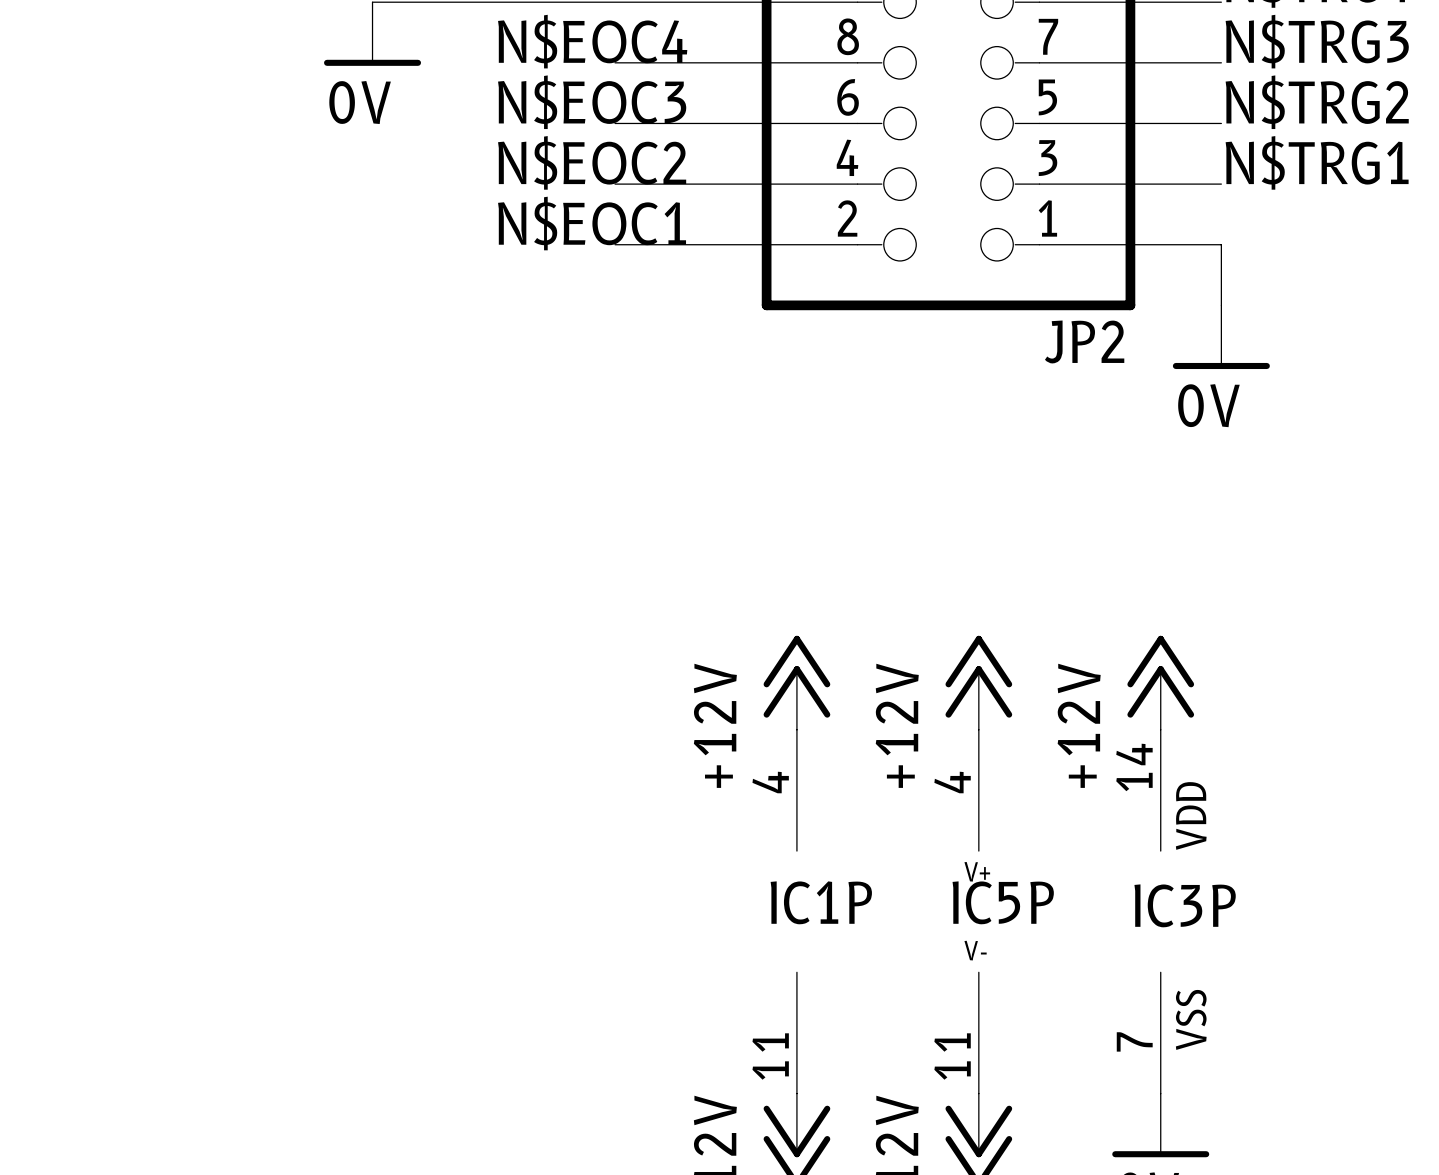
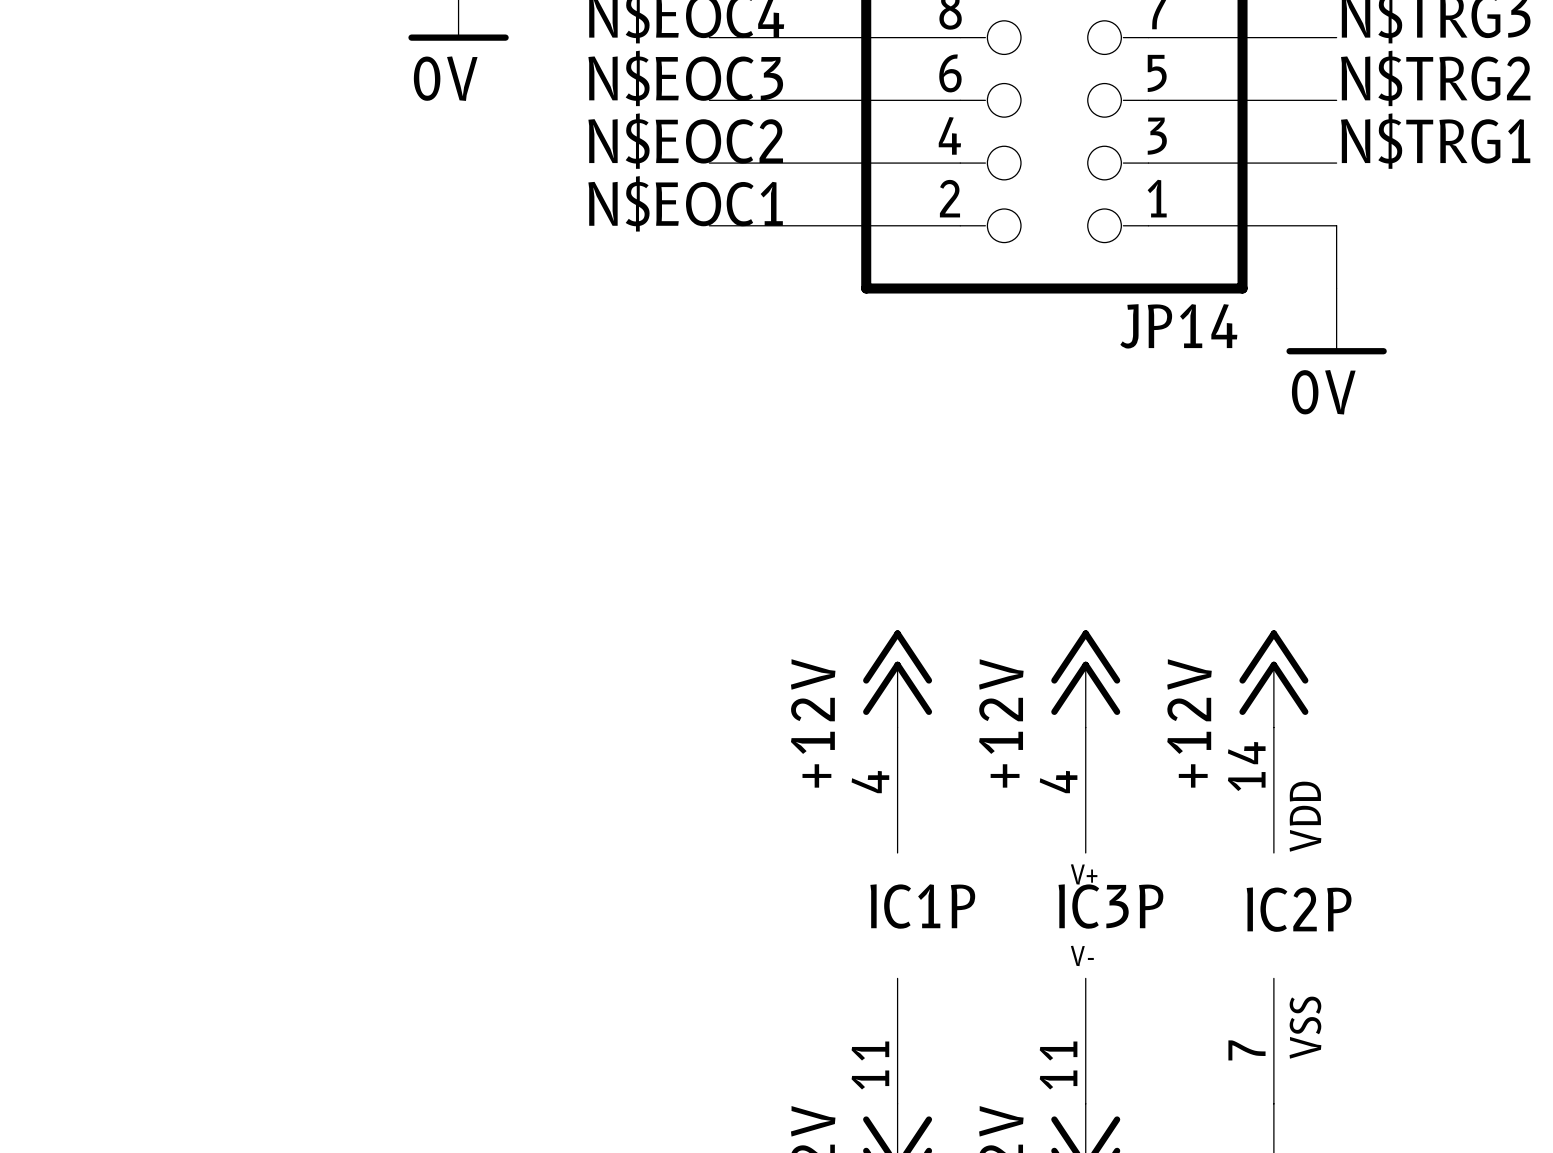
JP2 name: JP2 (1084, 341) -> JP14 (1178, 326)
IC5P name: IC5P (1003, 902) -> IC3P (1110, 906)
IC3P name: IC3P (1185, 905) -> IC2P (1299, 909)

